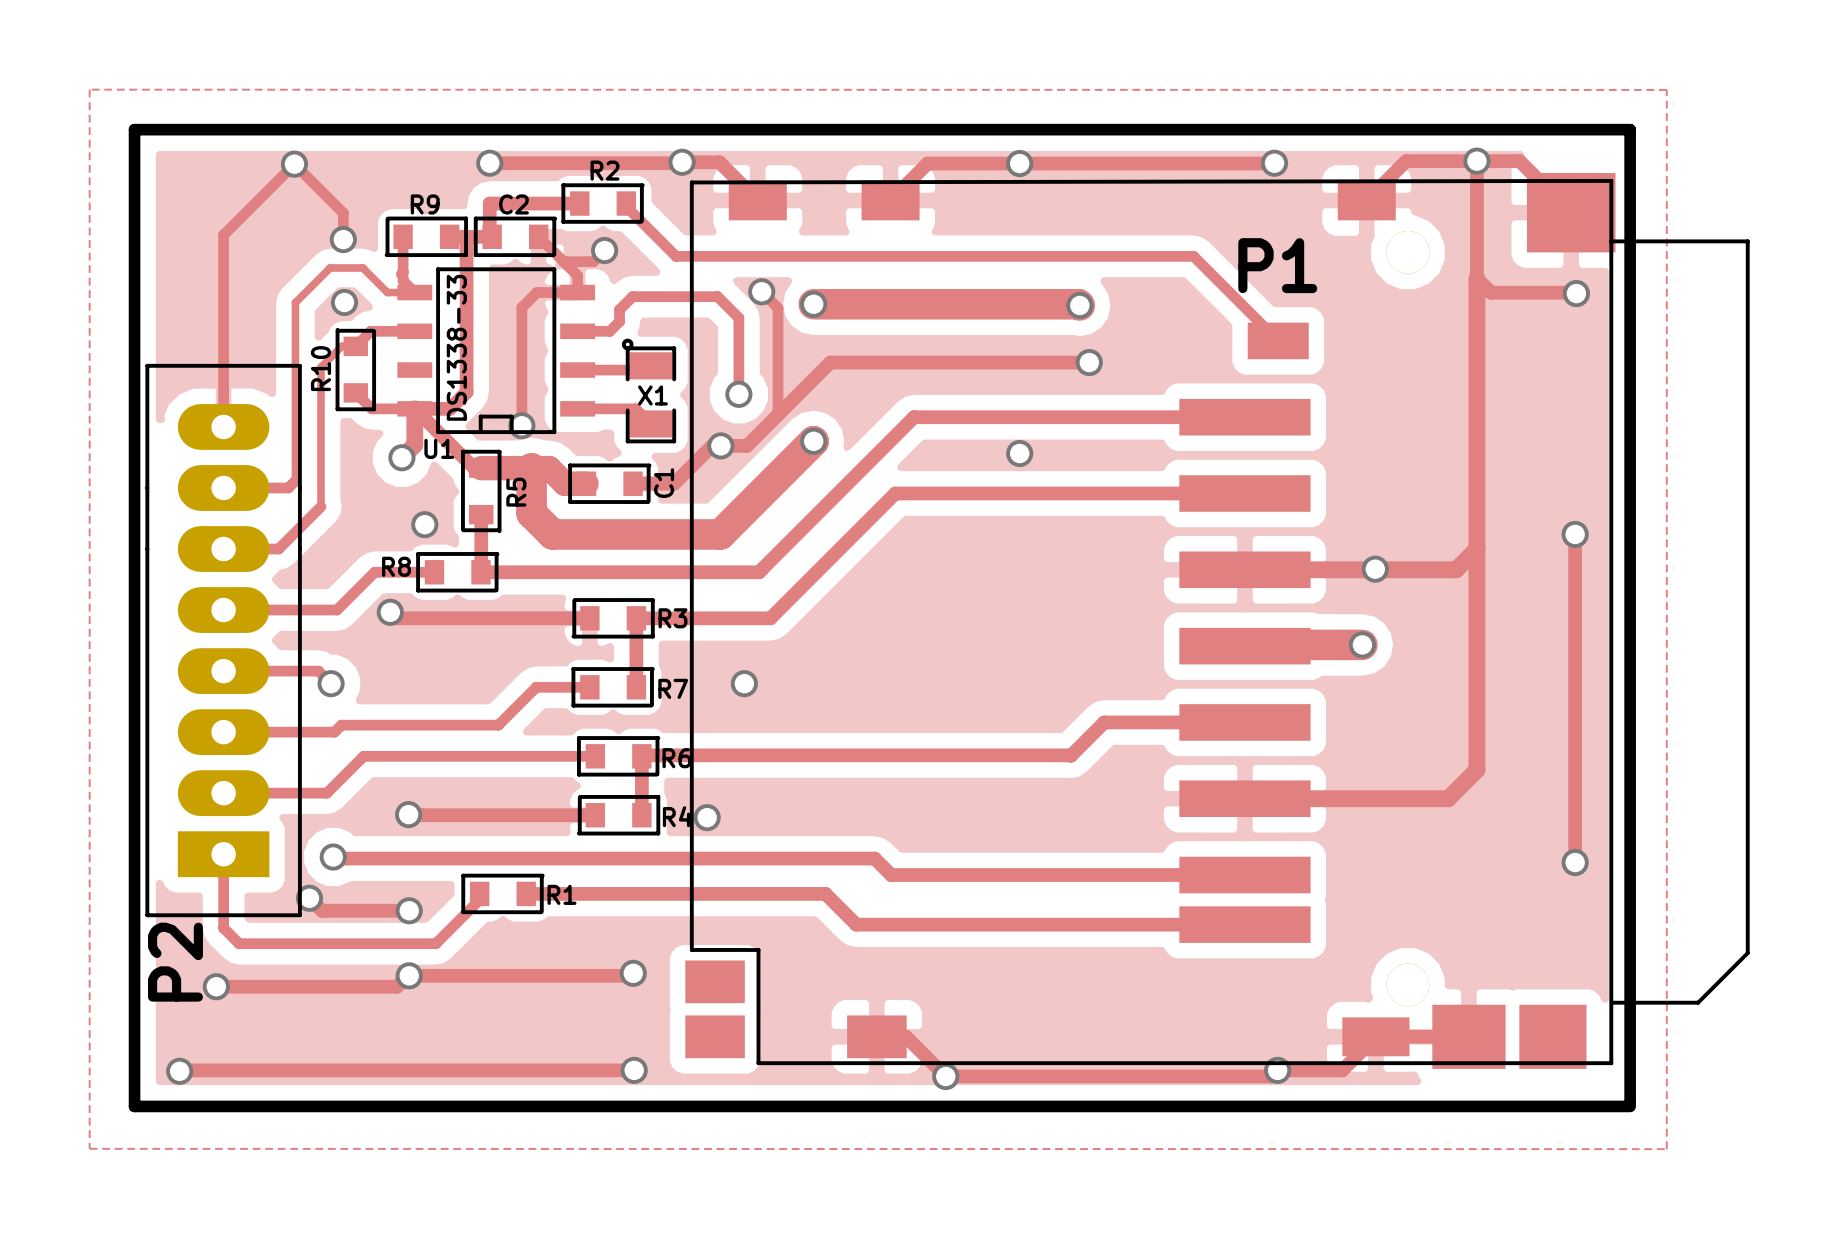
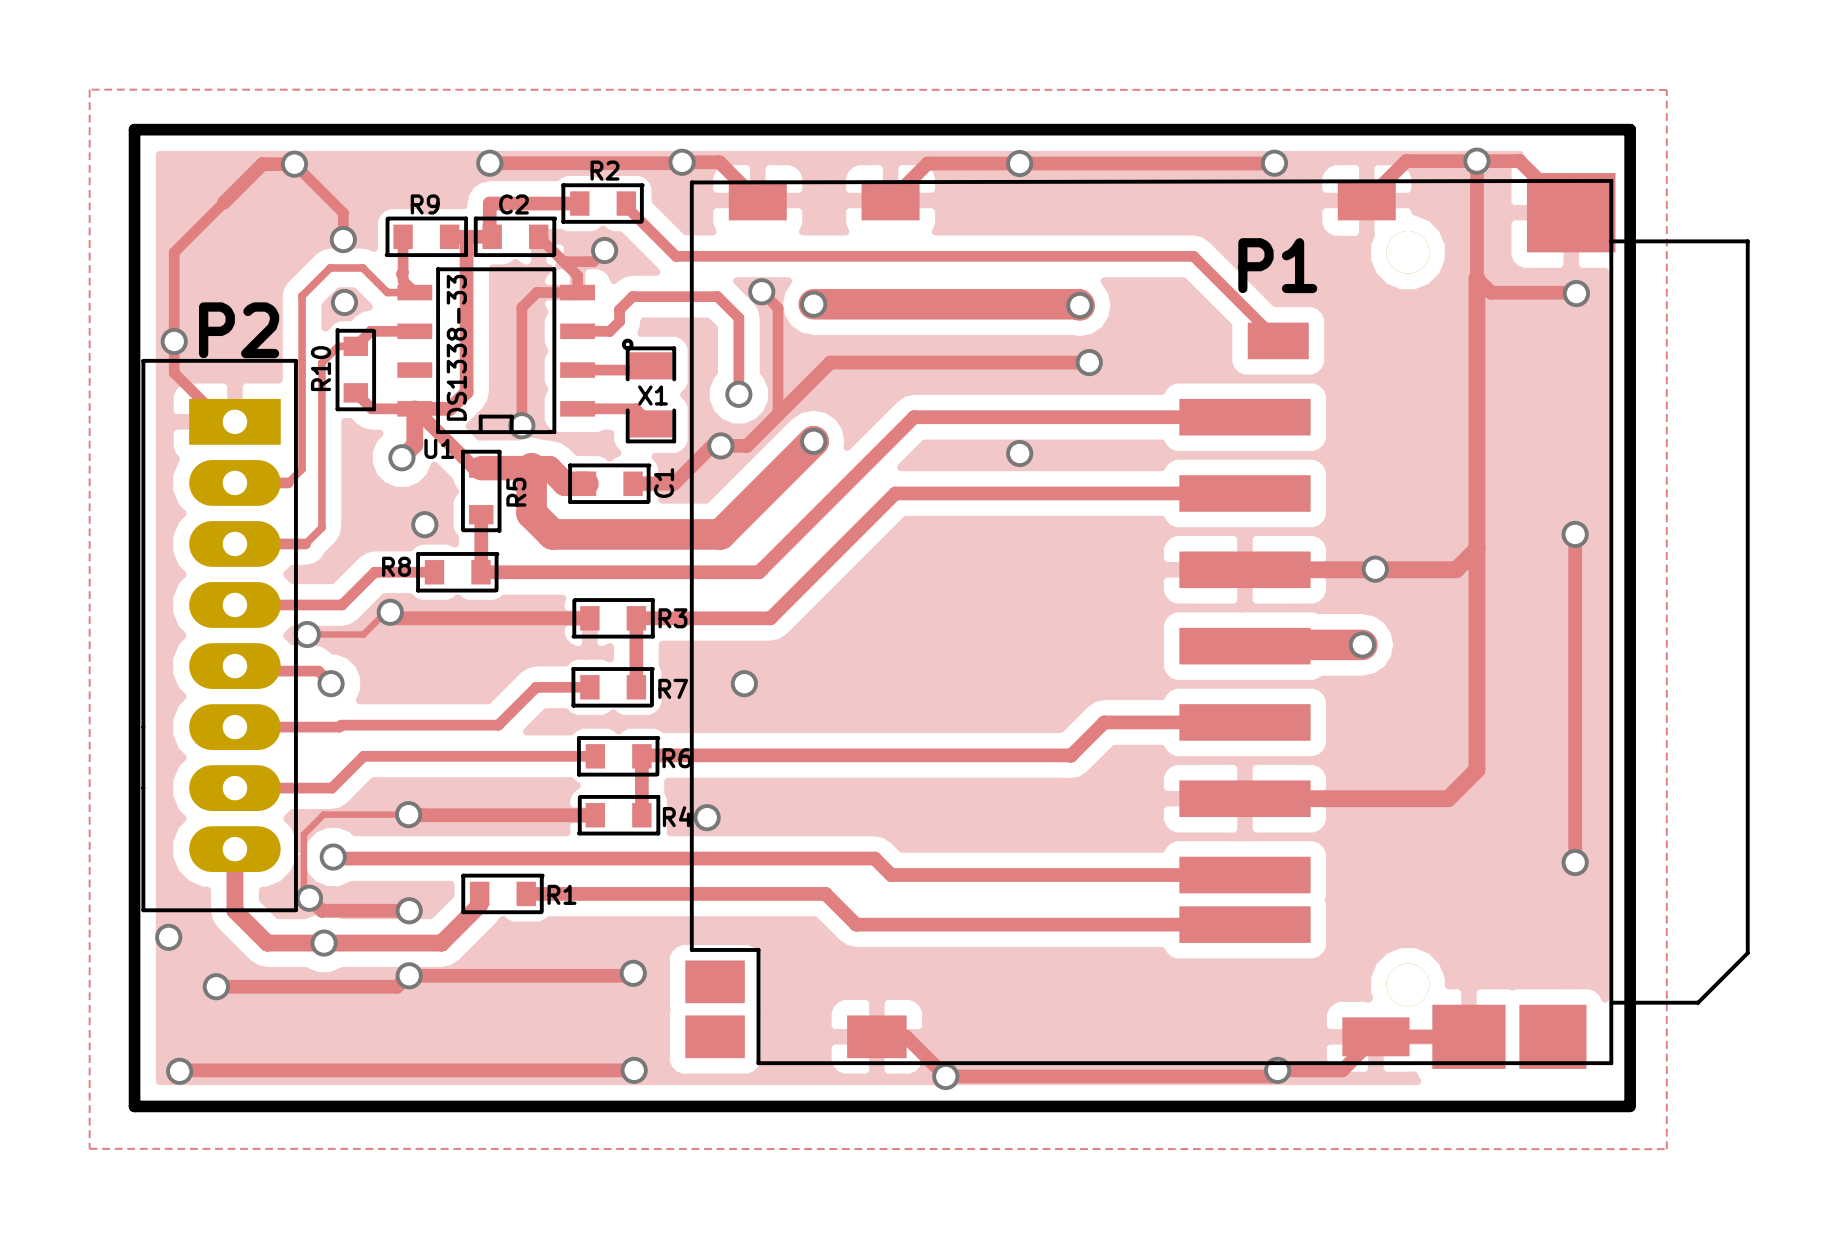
track: (294, 164) (223, 235) (223, 426) -> (294, 164) (262, 164) (174, 252) (174, 372) (223, 421) (234, 421)
track: (301, 296) (295, 302) (295, 480) (288, 487) (223, 487) -> (302, 296) (302, 469) (288, 482) (234, 482)
via: none -> (174, 341)
track: (341, 346) (321, 367) (321, 506) (278, 549) (223, 549) -> (341, 346) (338, 346) (321, 362) (321, 527) (305, 543) (234, 543)
P2 footprint: [145, 363, 302, 918] -> [141, 358, 298, 913]
track: (342, 604) (336, 610) (223, 610) -> (342, 604) (234, 604)
track: none -> (390, 612) (385, 612) (363, 634) (307, 634)
via: none -> (307, 634)
track: (339, 727) (334, 732) (223, 732) -> (339, 727) (234, 727)
track: (331, 788) (326, 793) (223, 793) -> (331, 788) (234, 788)
track: none -> (408, 814) (323, 814) (303, 834) (303, 892) (309, 898)
track: none -> (234, 849) (234, 910) (267, 943) (441, 943) (479, 905) (479, 893)
track: (223, 854) (223, 928) (239, 943) (435, 943) (479, 899) -> none
via: none -> (168, 937)
via: none -> (324, 943)
P2 name position: P2 (175, 962) -> P2 (239, 330)

